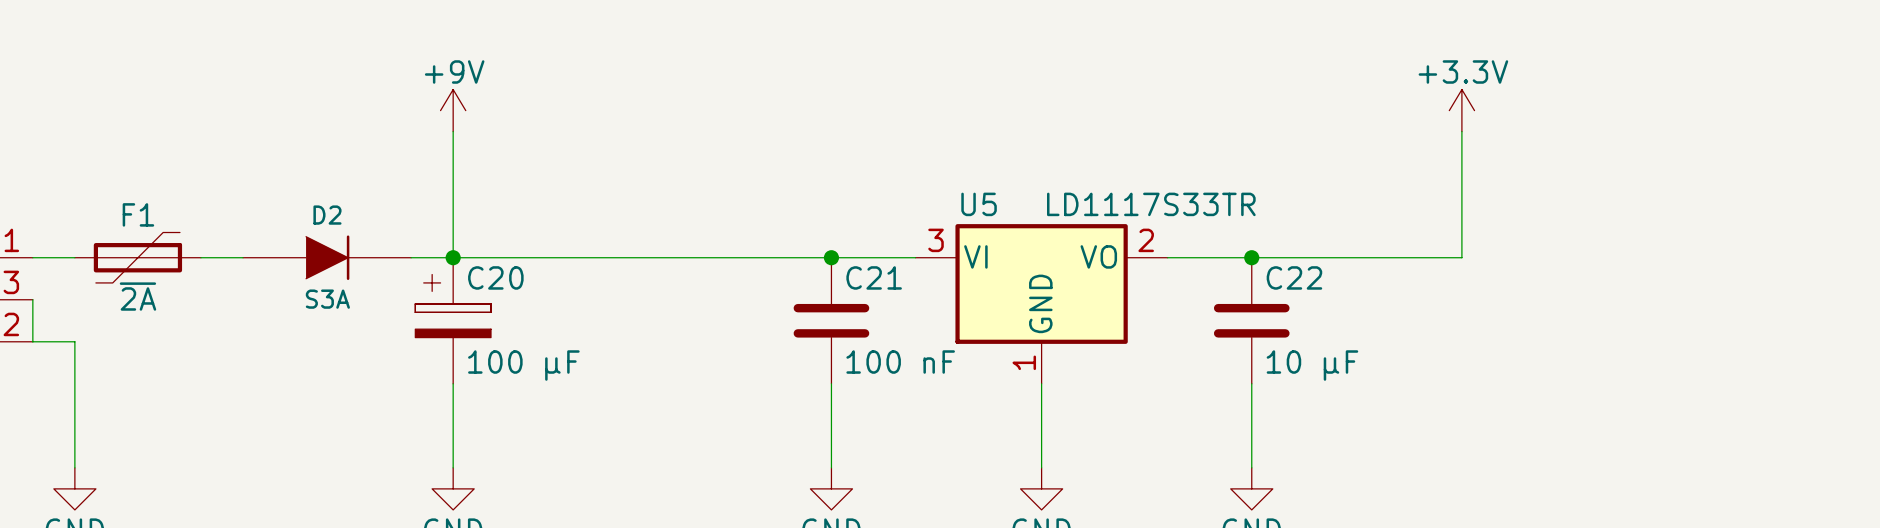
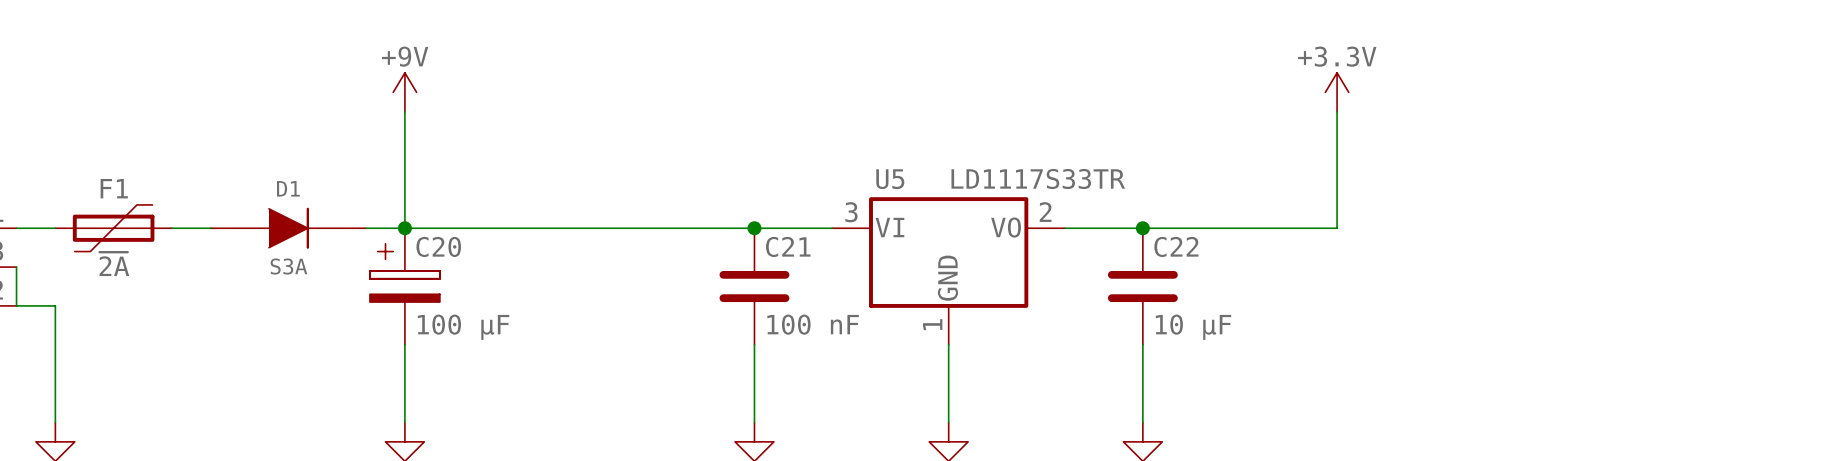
D2 name: D2 (327, 215) -> D1 (288, 188)

